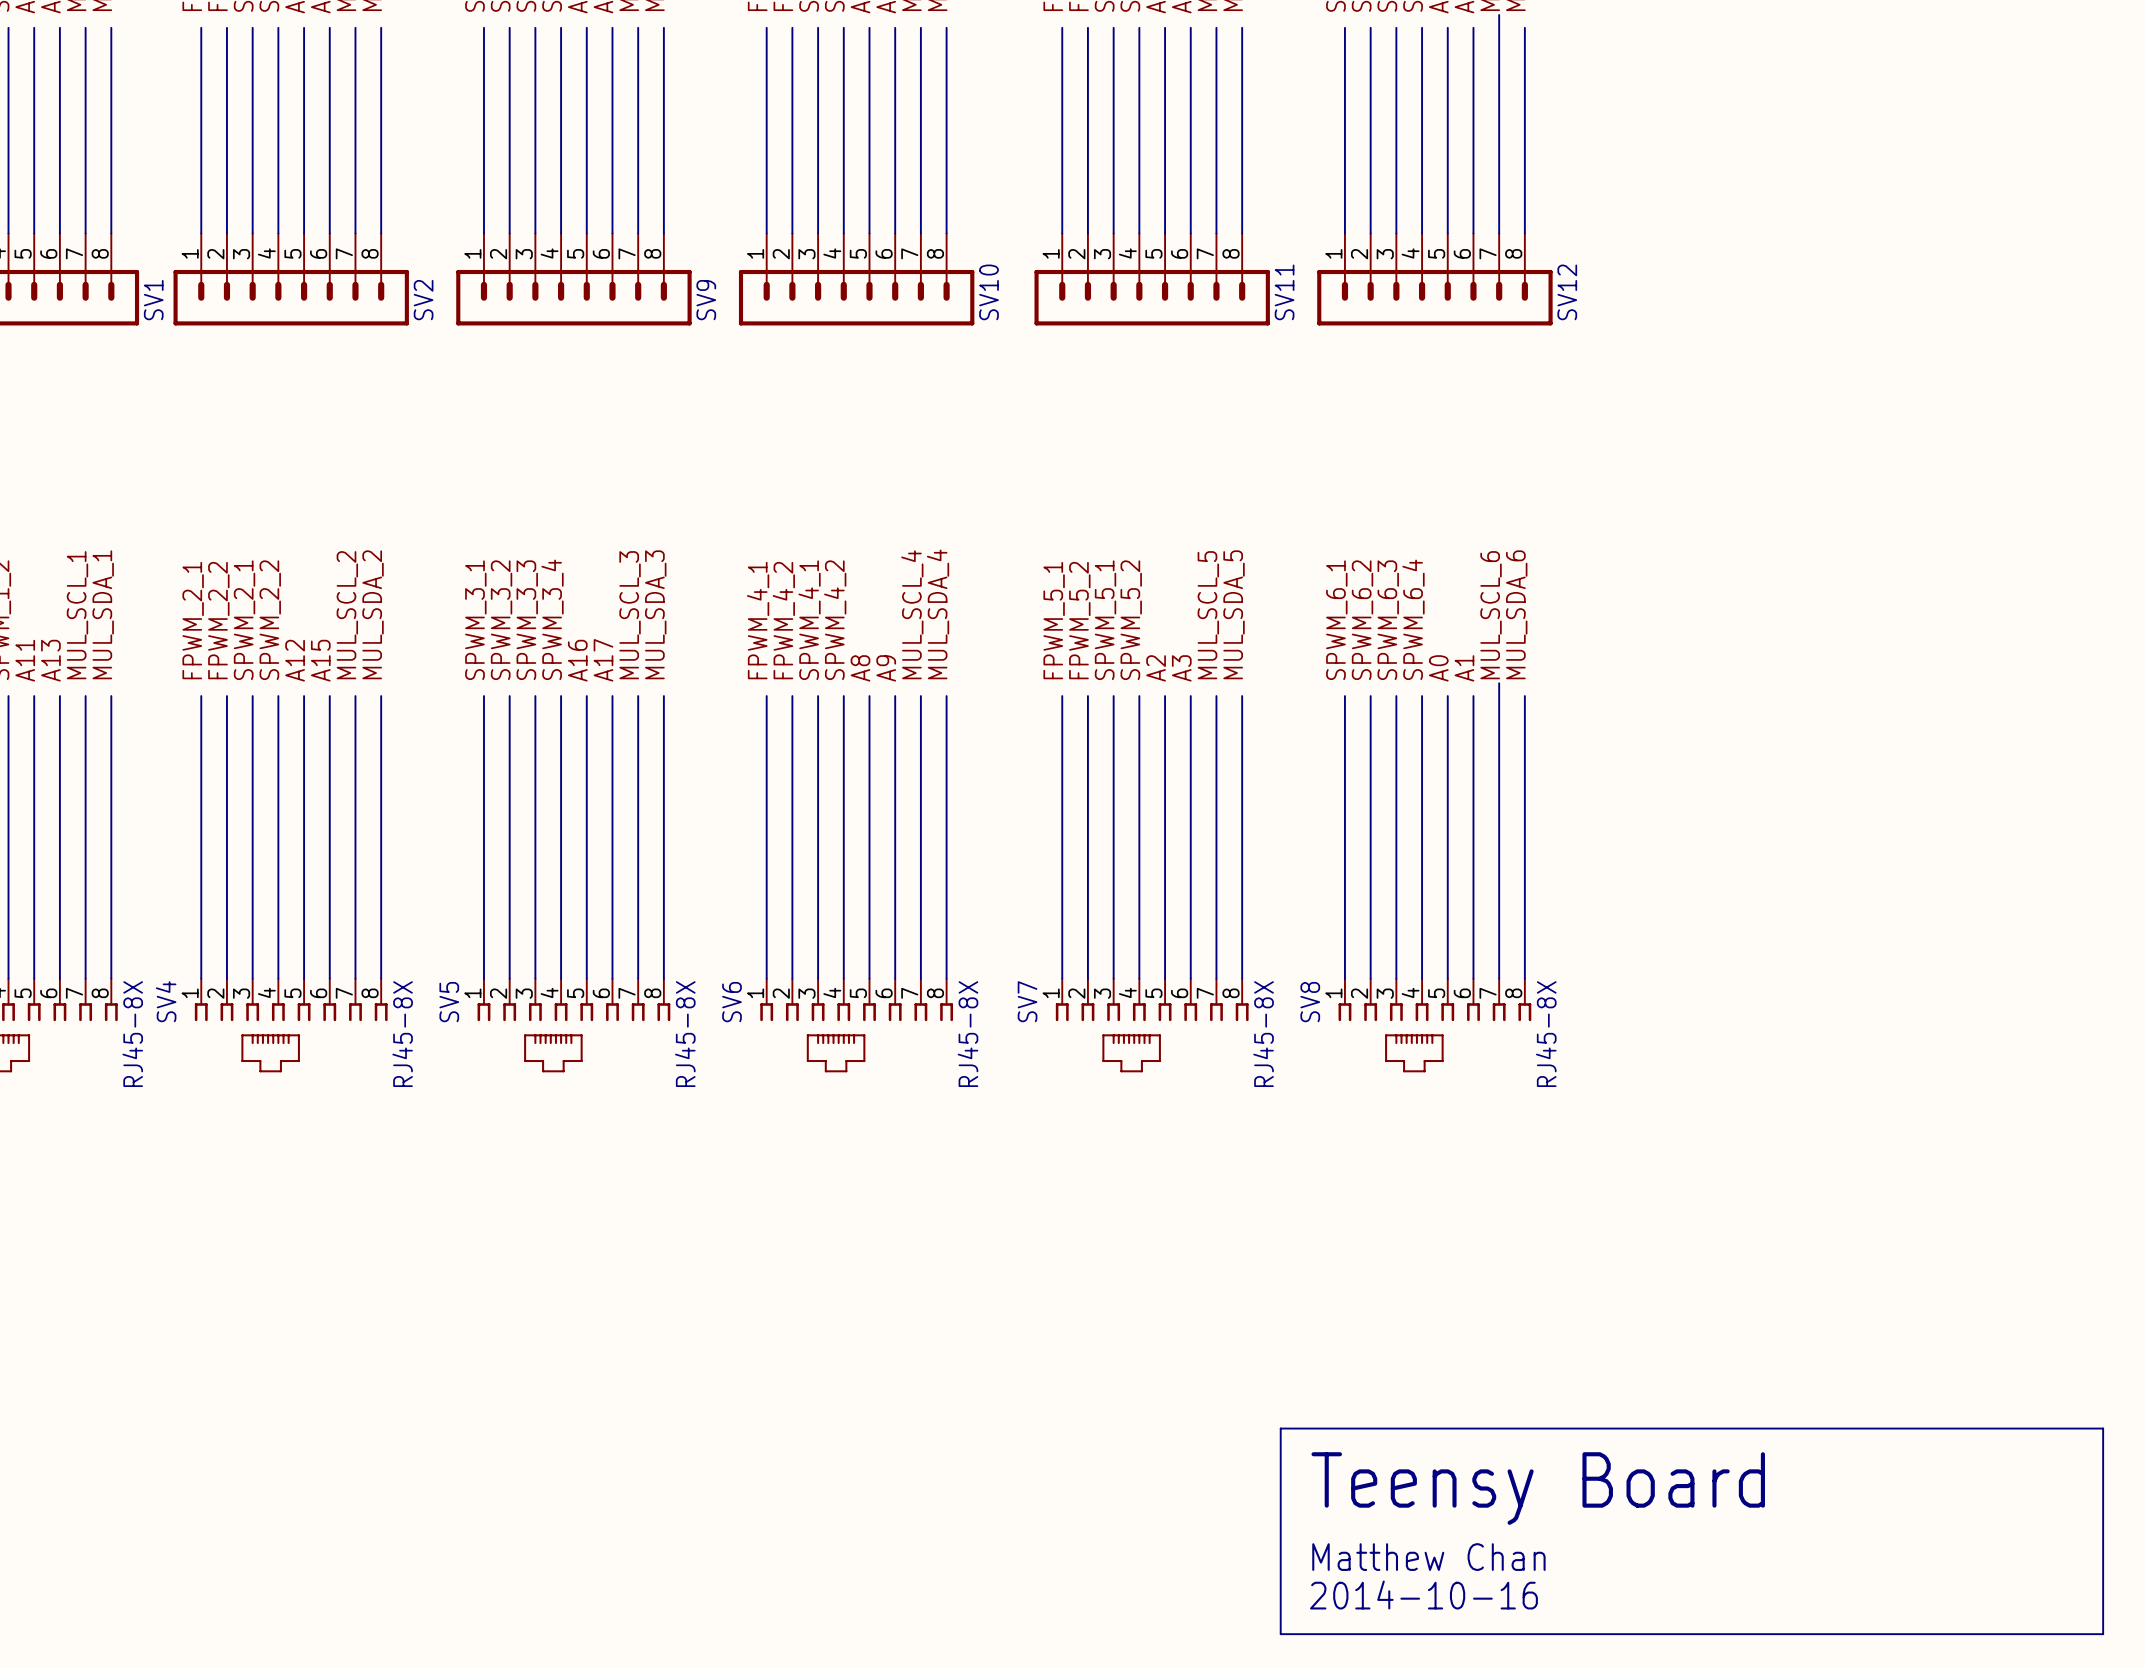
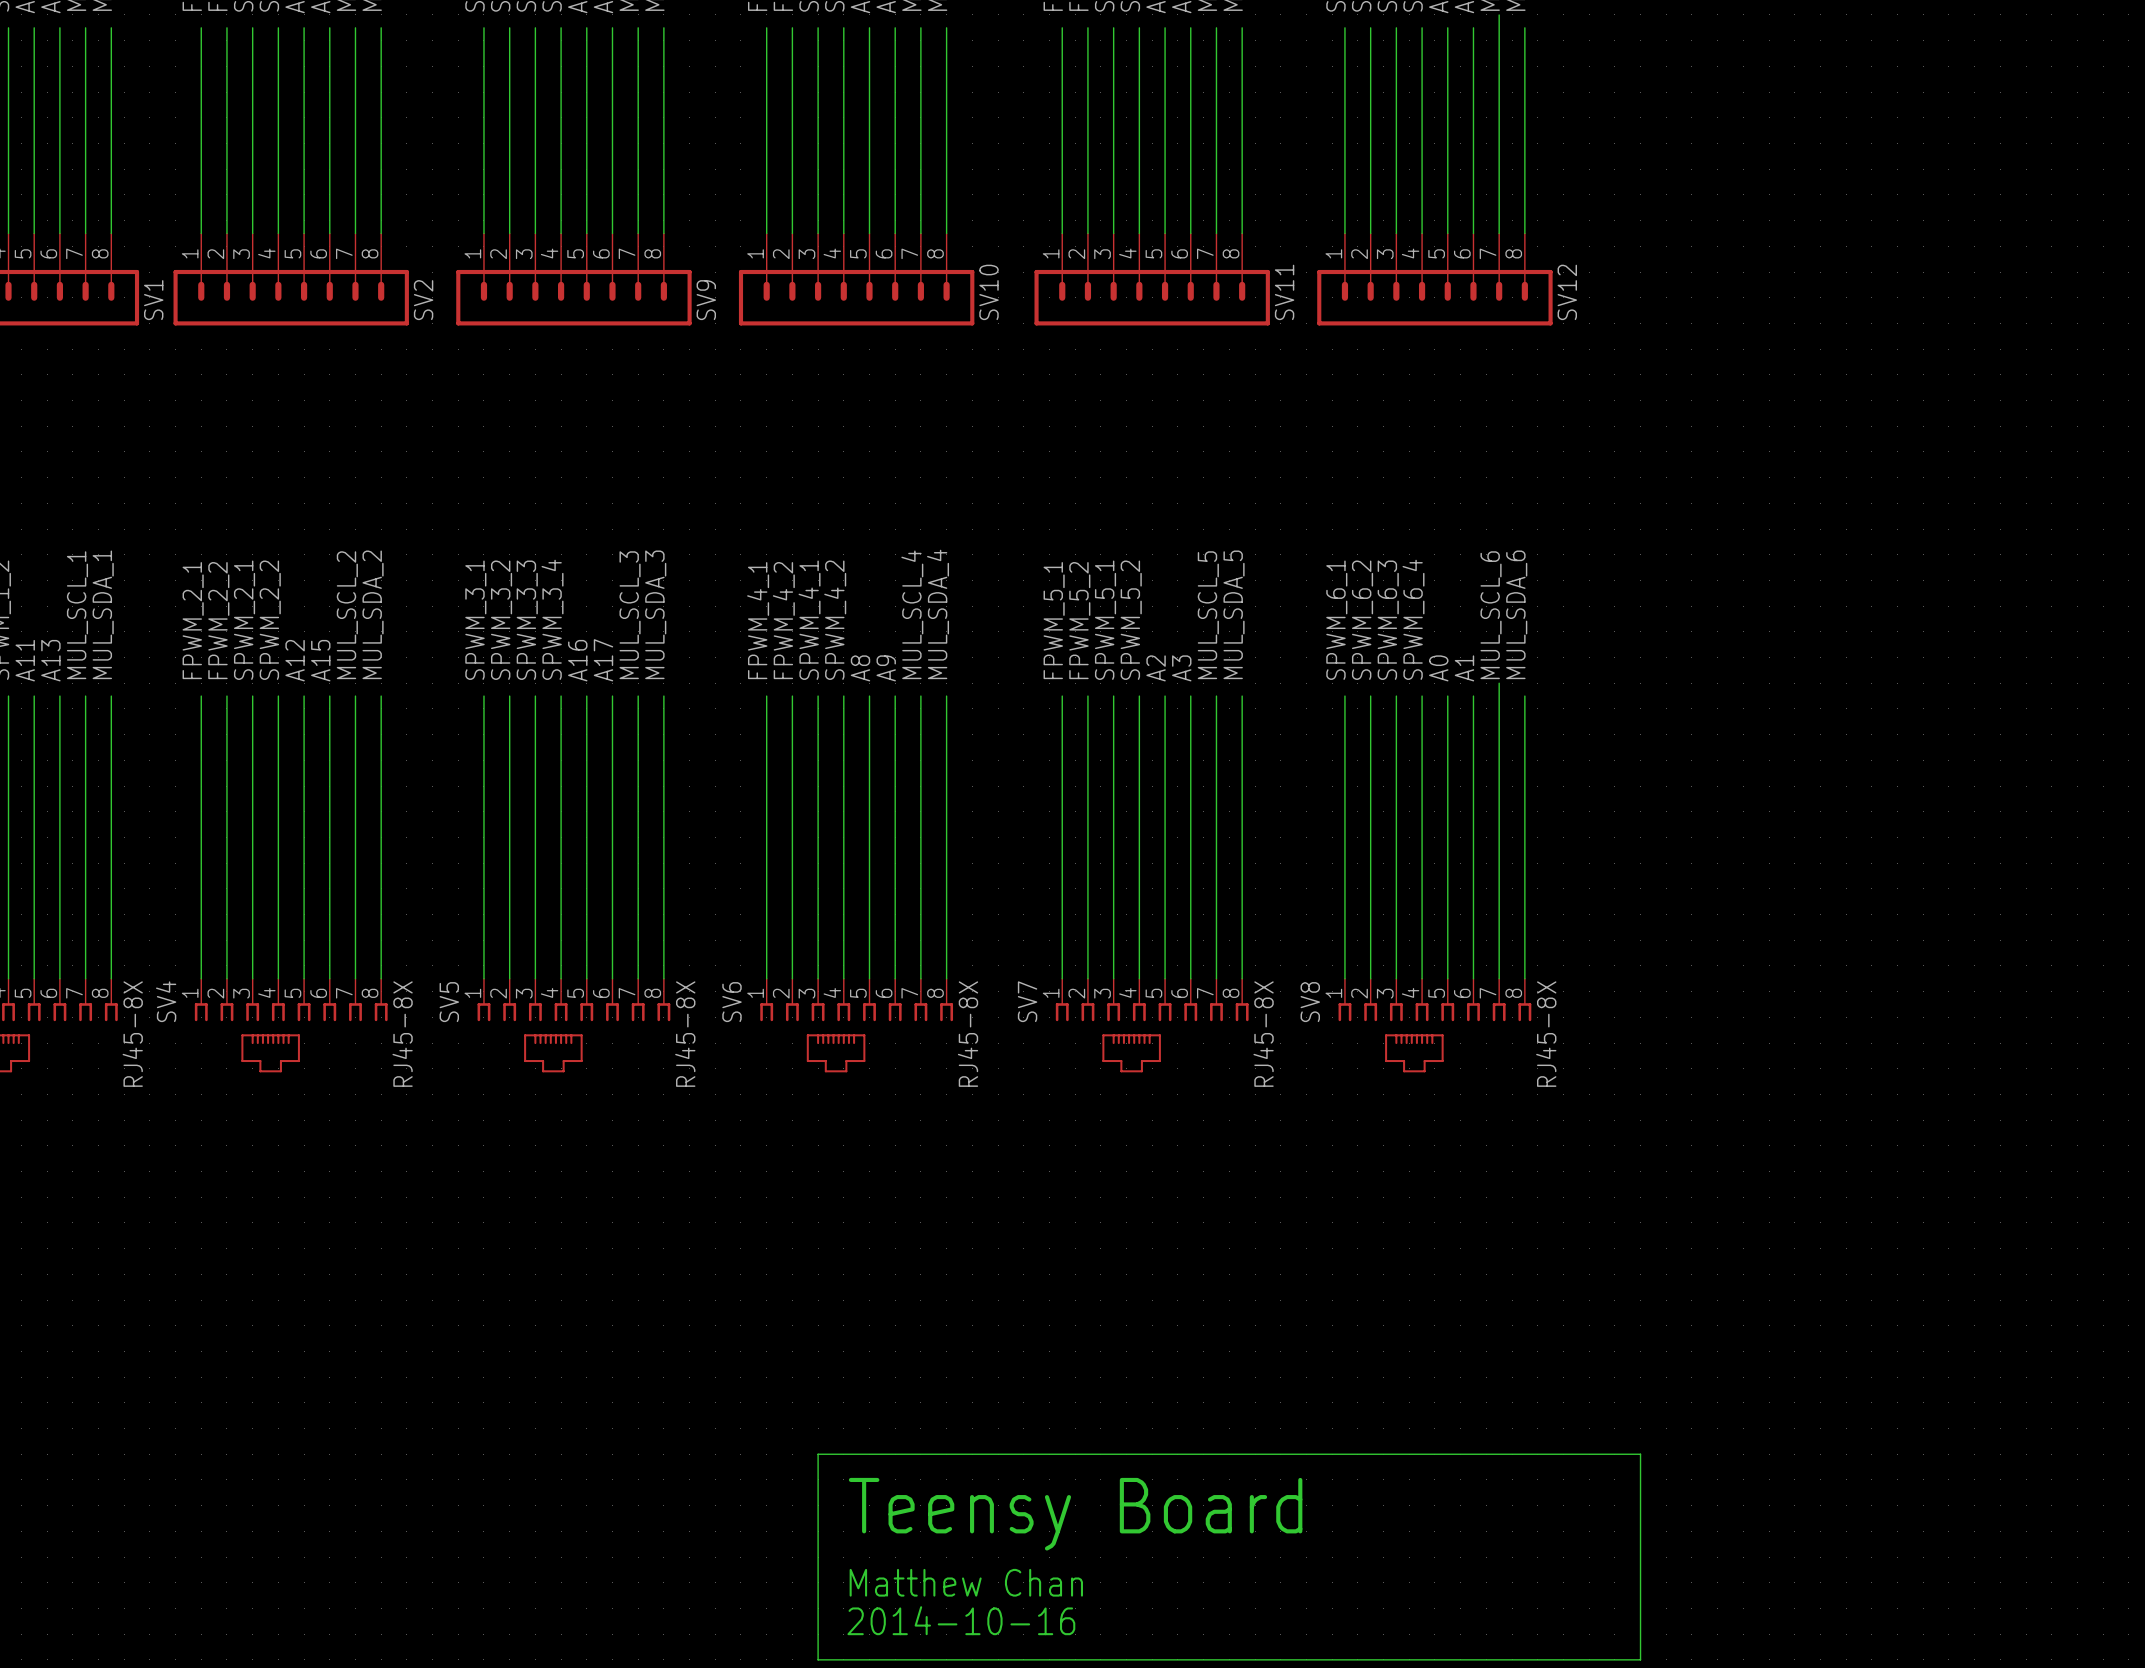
wire: (1280, 1428) (2103, 1428) (2103, 1634) (1280, 1634) (1280, 1428) -> none
wire: none -> (818, 1454) (1640, 1454) (1640, 1659) (818, 1659) (818, 1454)
text: Teensy Board (1538, 1488) -> none
text: none -> Teensy Board (1075, 1514)
text: Matthew Chan (1428, 1557) -> none
text: none -> Matthew Chan (966, 1582)
text: 2014-10-16 (1423, 1594) -> none
text: none -> 2014-10-16 (961, 1620)

